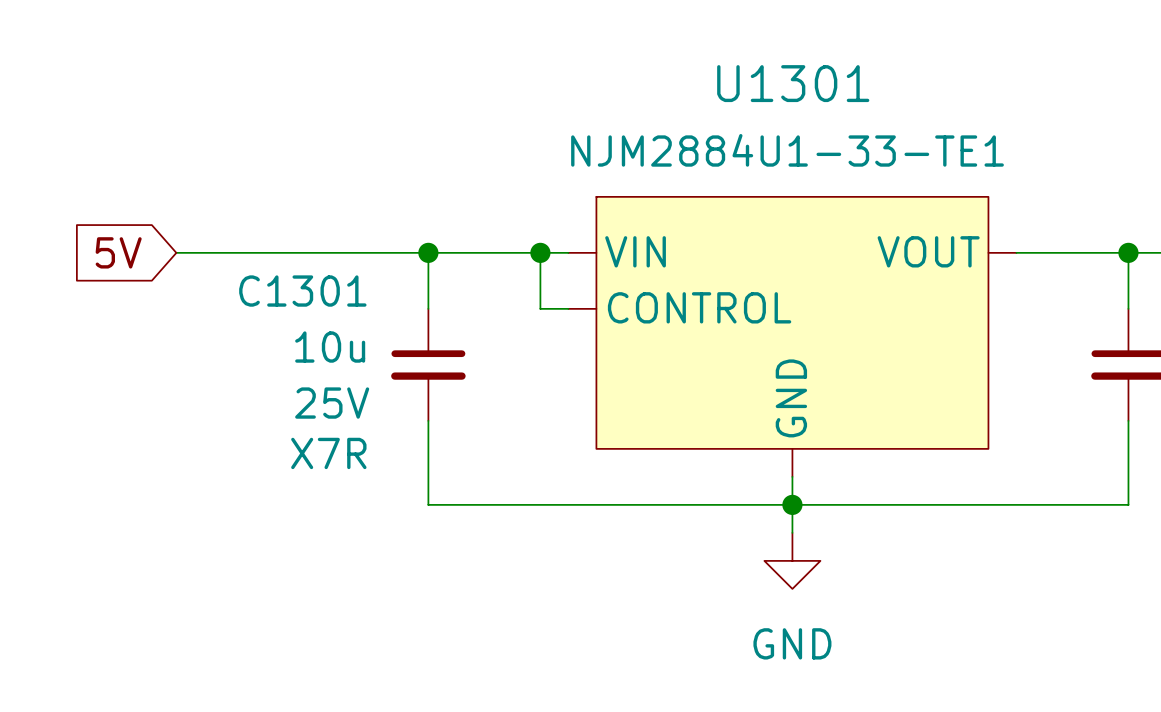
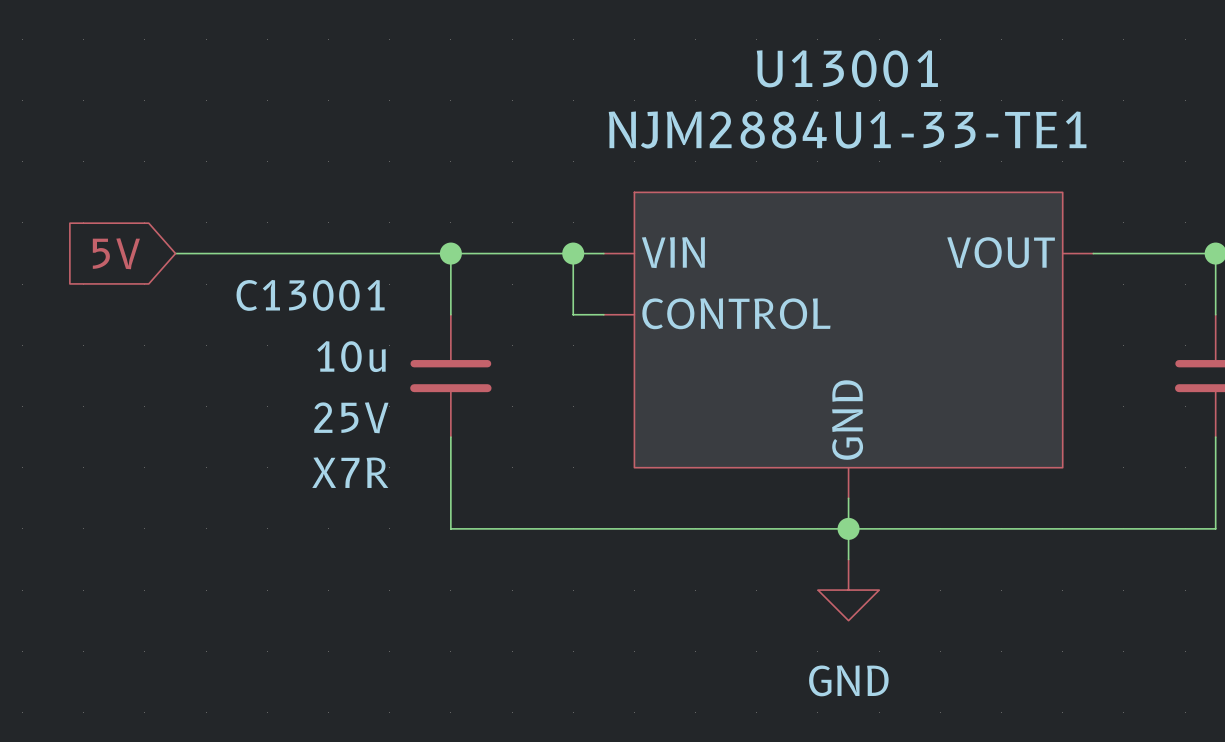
U1301 name: U1301 (793, 83) -> U13001 (847, 68)
U1301 value: none -> NJM2884U1-33-TE1 (847, 130)
U1301 text: NJM2884U1-33-TE1 (787, 150) -> none
C1301 name: C1301 (302, 291) -> C13001 (310, 295)

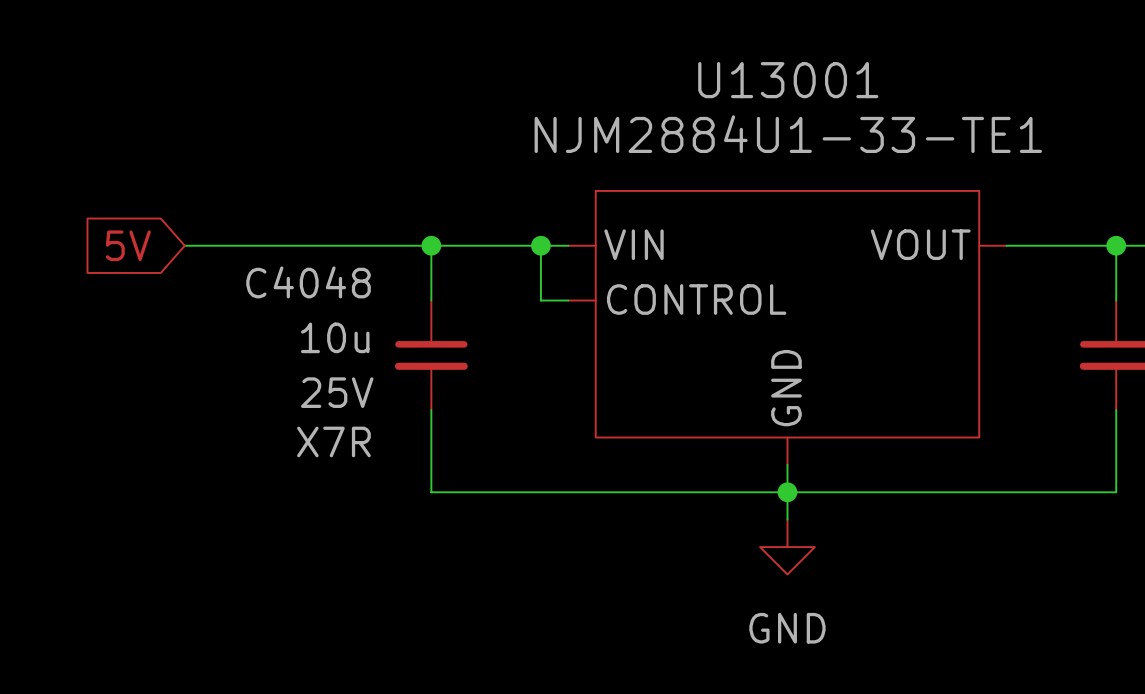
C13001 name: C13001 (310, 295) -> C4048 (308, 282)

